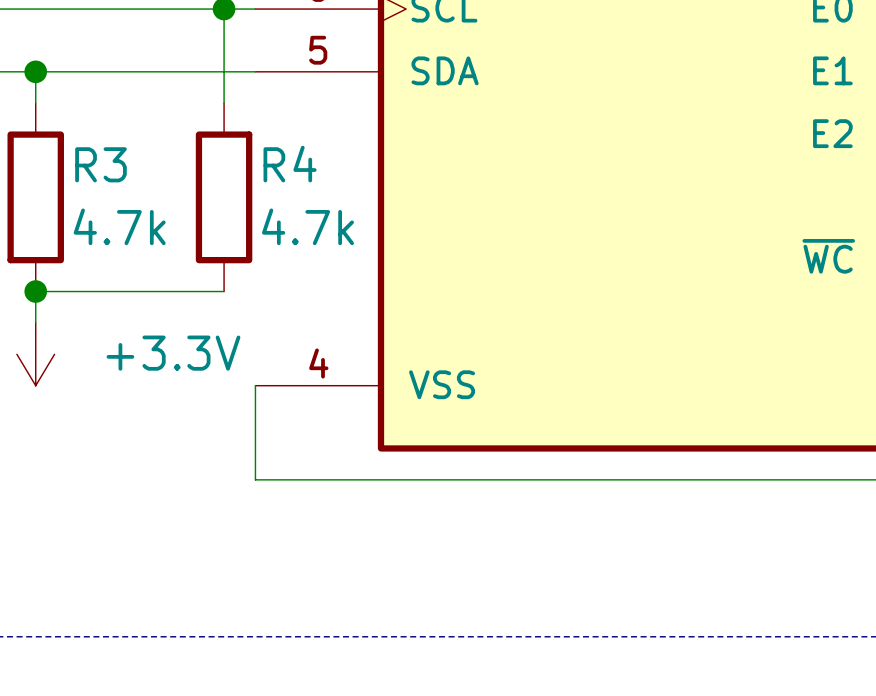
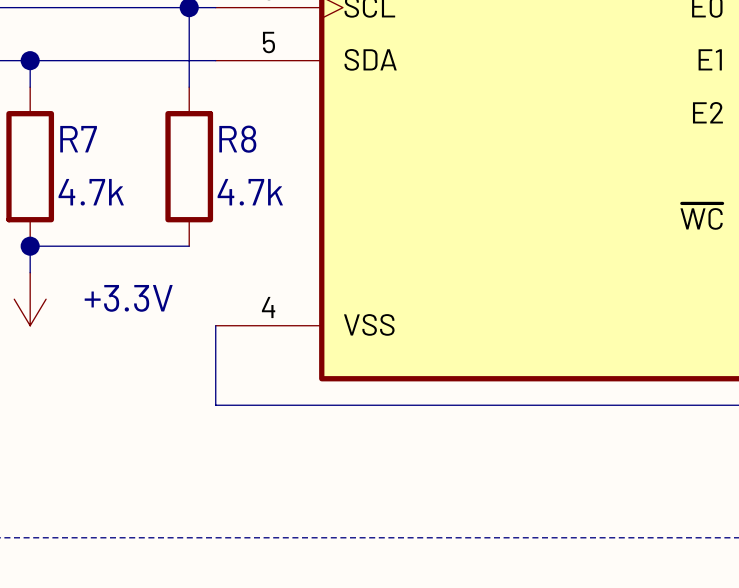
R3 name: R3 (100, 164) -> R7 (78, 139)
R4 name: R4 (290, 164) -> R8 (237, 139)

